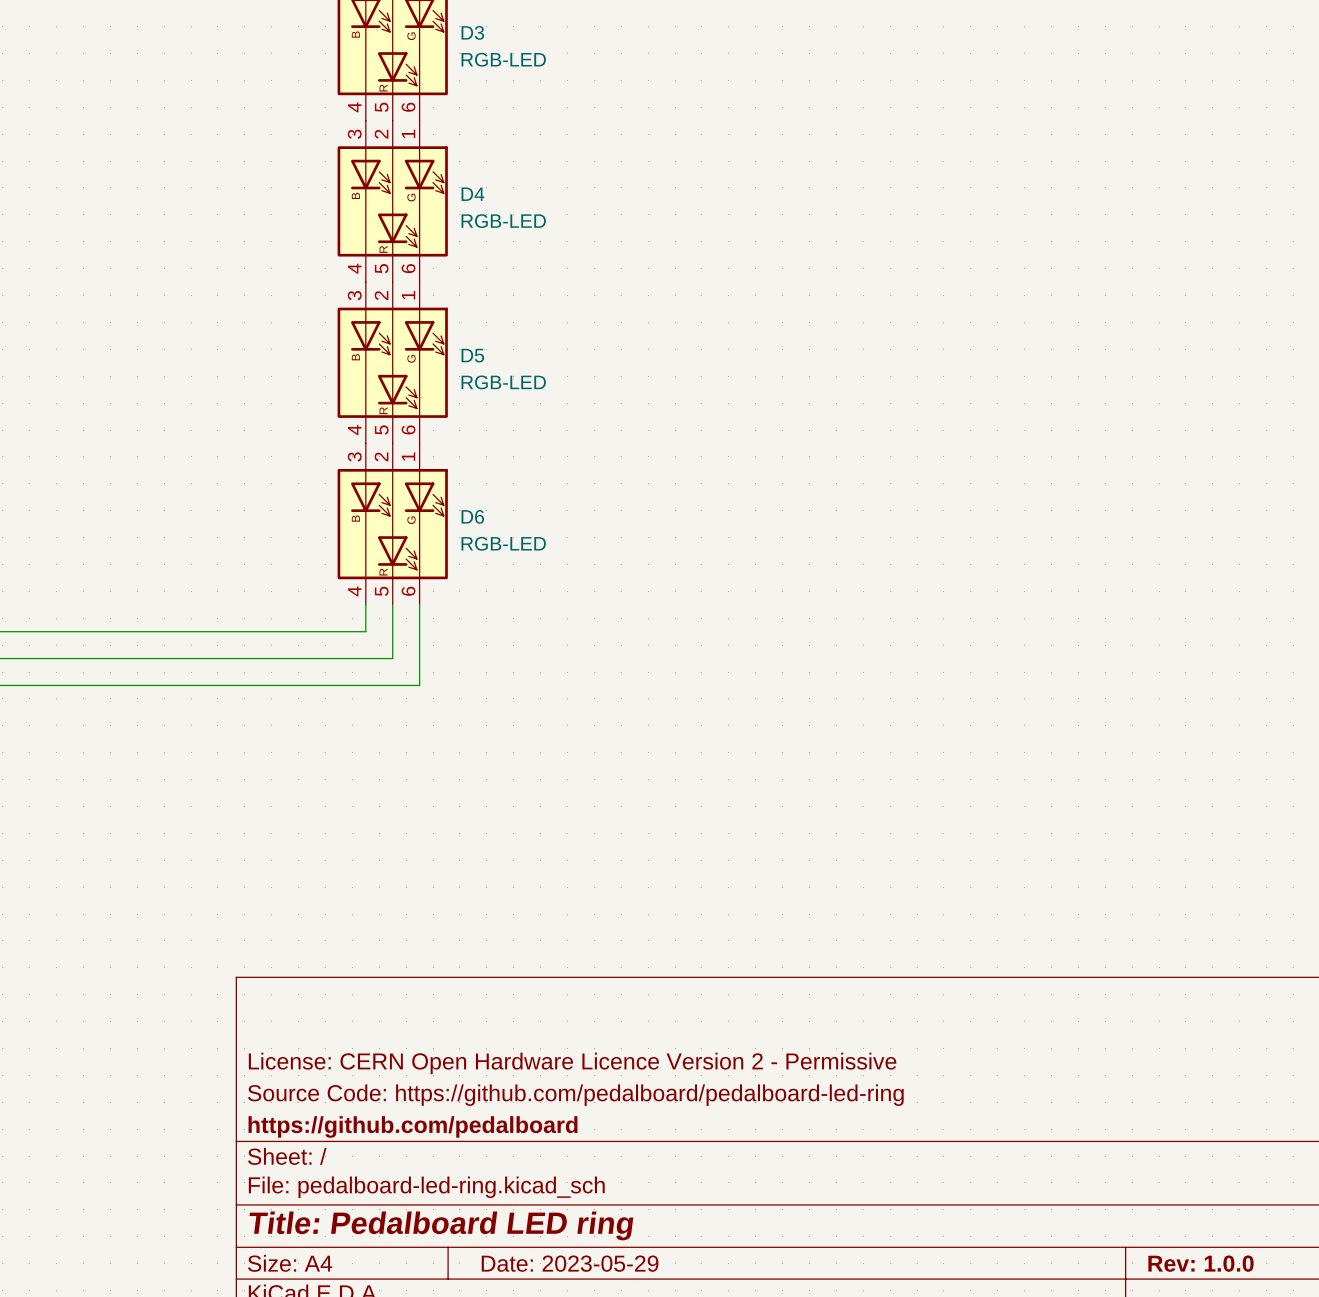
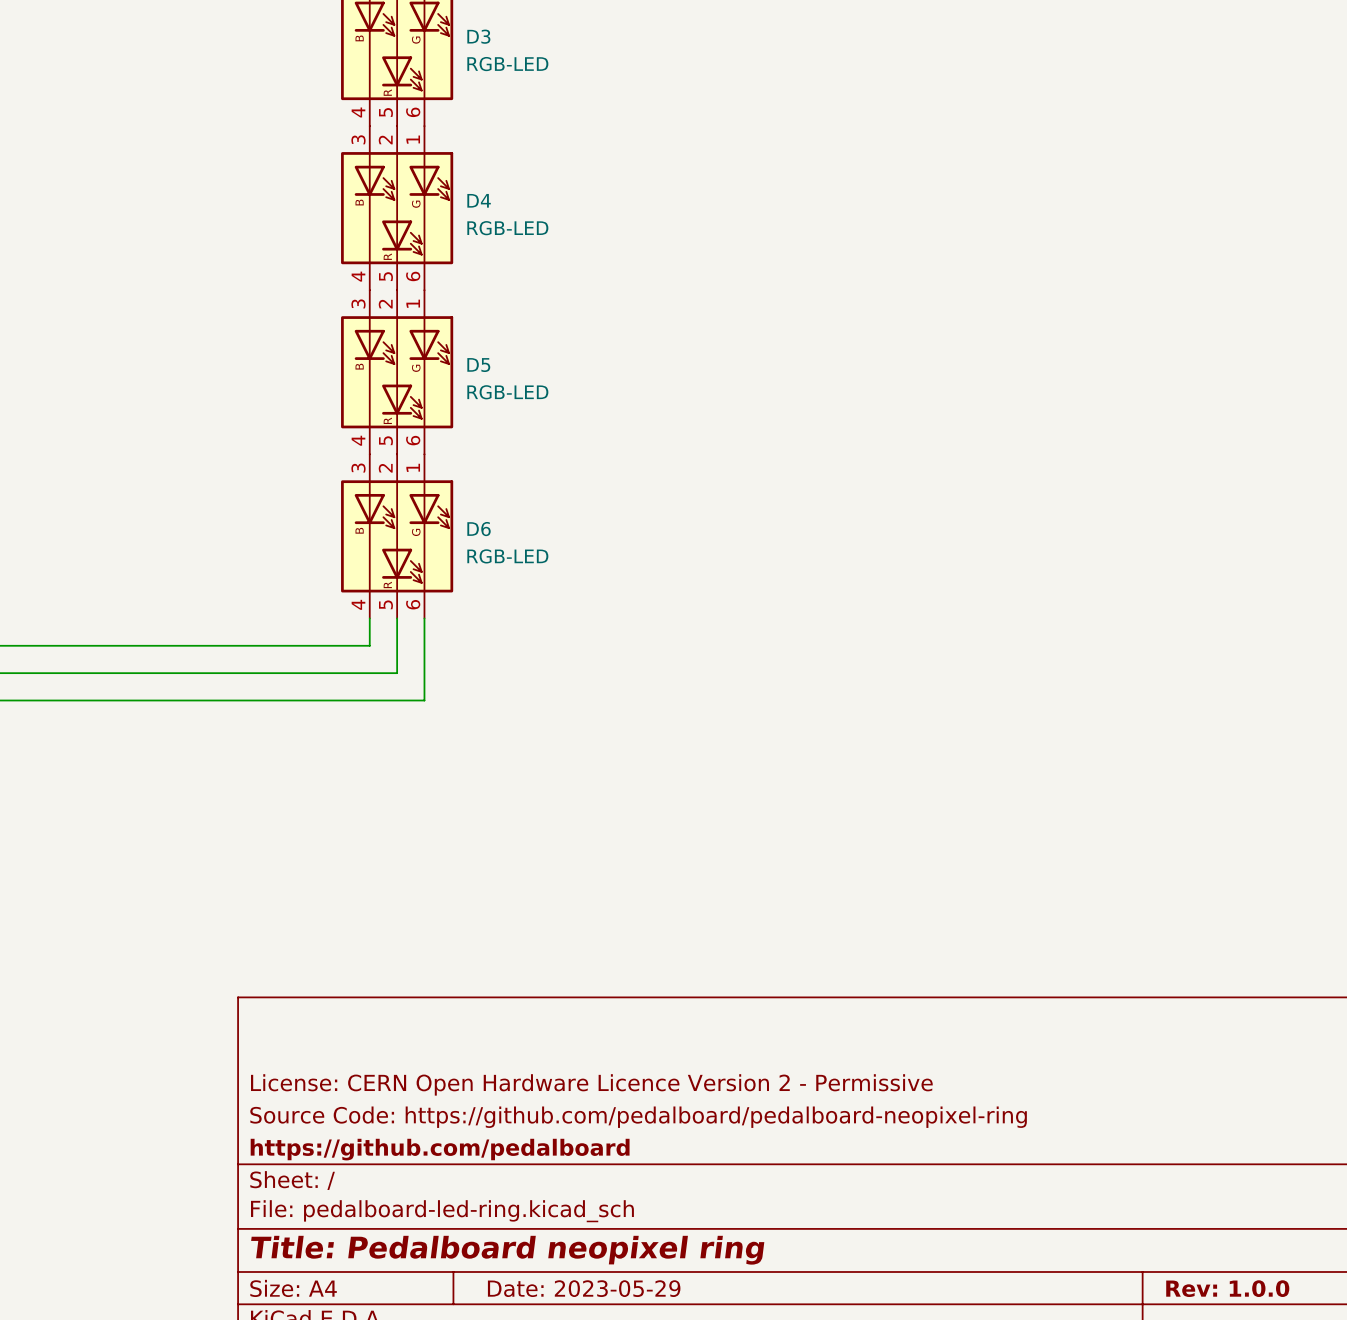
title block: Source Code: https://github.com/pedalboard/pedalboard-led-ring (575, 1095) -> Source Code: https://github.com/pedalboard/pedalboard-neopixel-ring (638, 1117)
title block: Title: Pedalboard LED ring (441, 1225) -> Title: Pedalboard neopixel ring (507, 1250)

